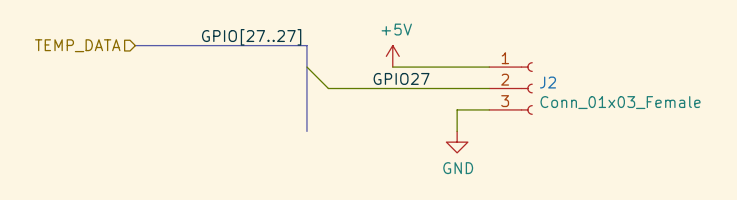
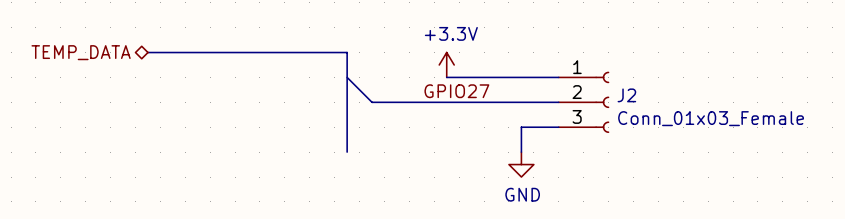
label: GPIO[27..27] (251, 37) -> none
hierarchical label shape: input (77, 45) -> bidirectional (81, 52)
power symbol: +5V (392, 56) -> +3.3V (446, 64)

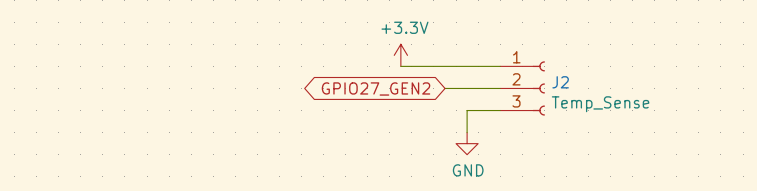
hierarchical label: TEMP_DATA (81, 52) -> none
bus: (147, 52) (347, 52) (347, 152) -> none
wire: (347, 77) (372, 102) (496, 102) -> none
label: GPIO27 (456, 91) -> none
global label: none -> GPIO27_GEN2 (376, 88)
J2 value: Conn_01x03_Female (711, 118) -> Temp_Sense (600, 104)

